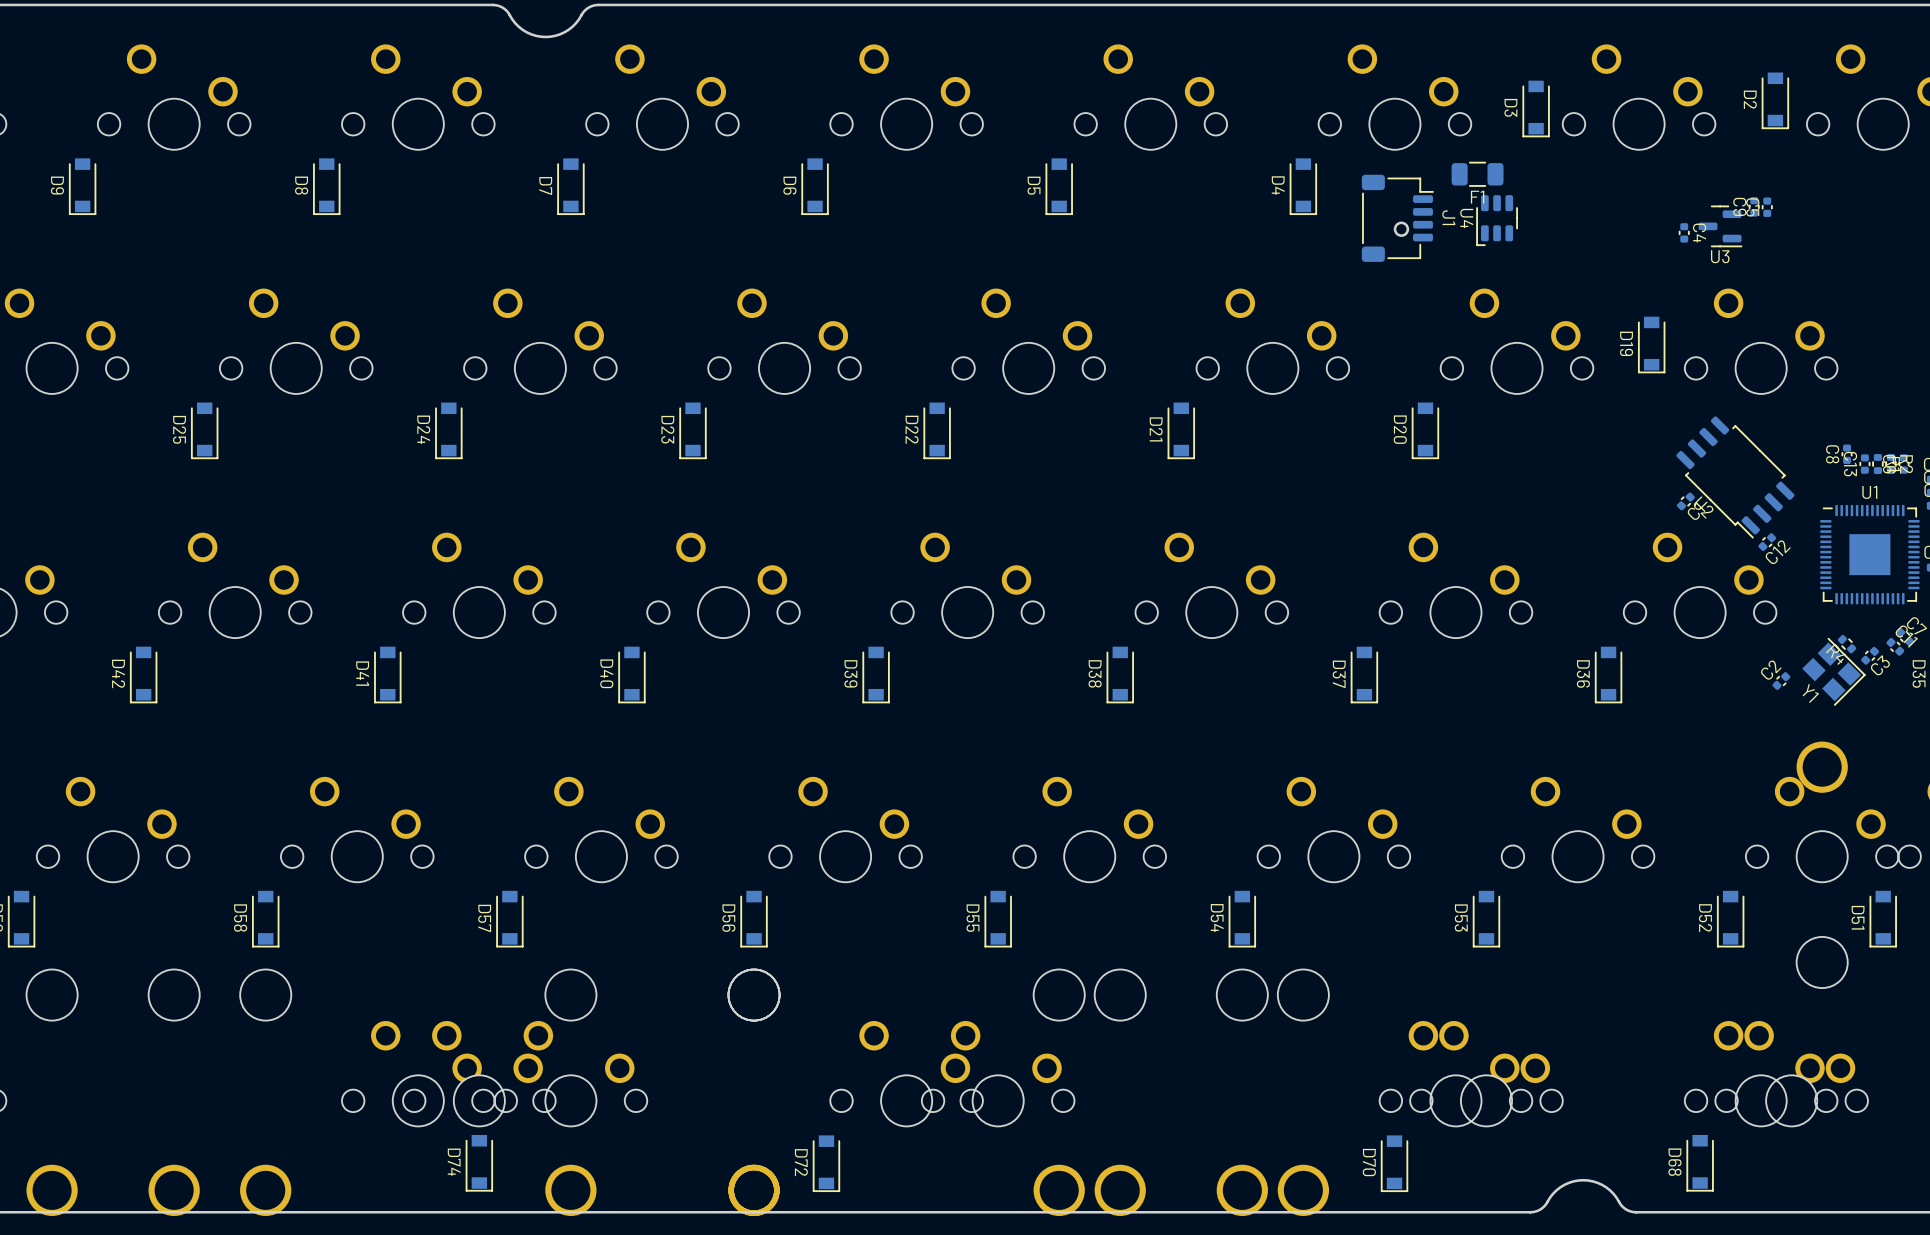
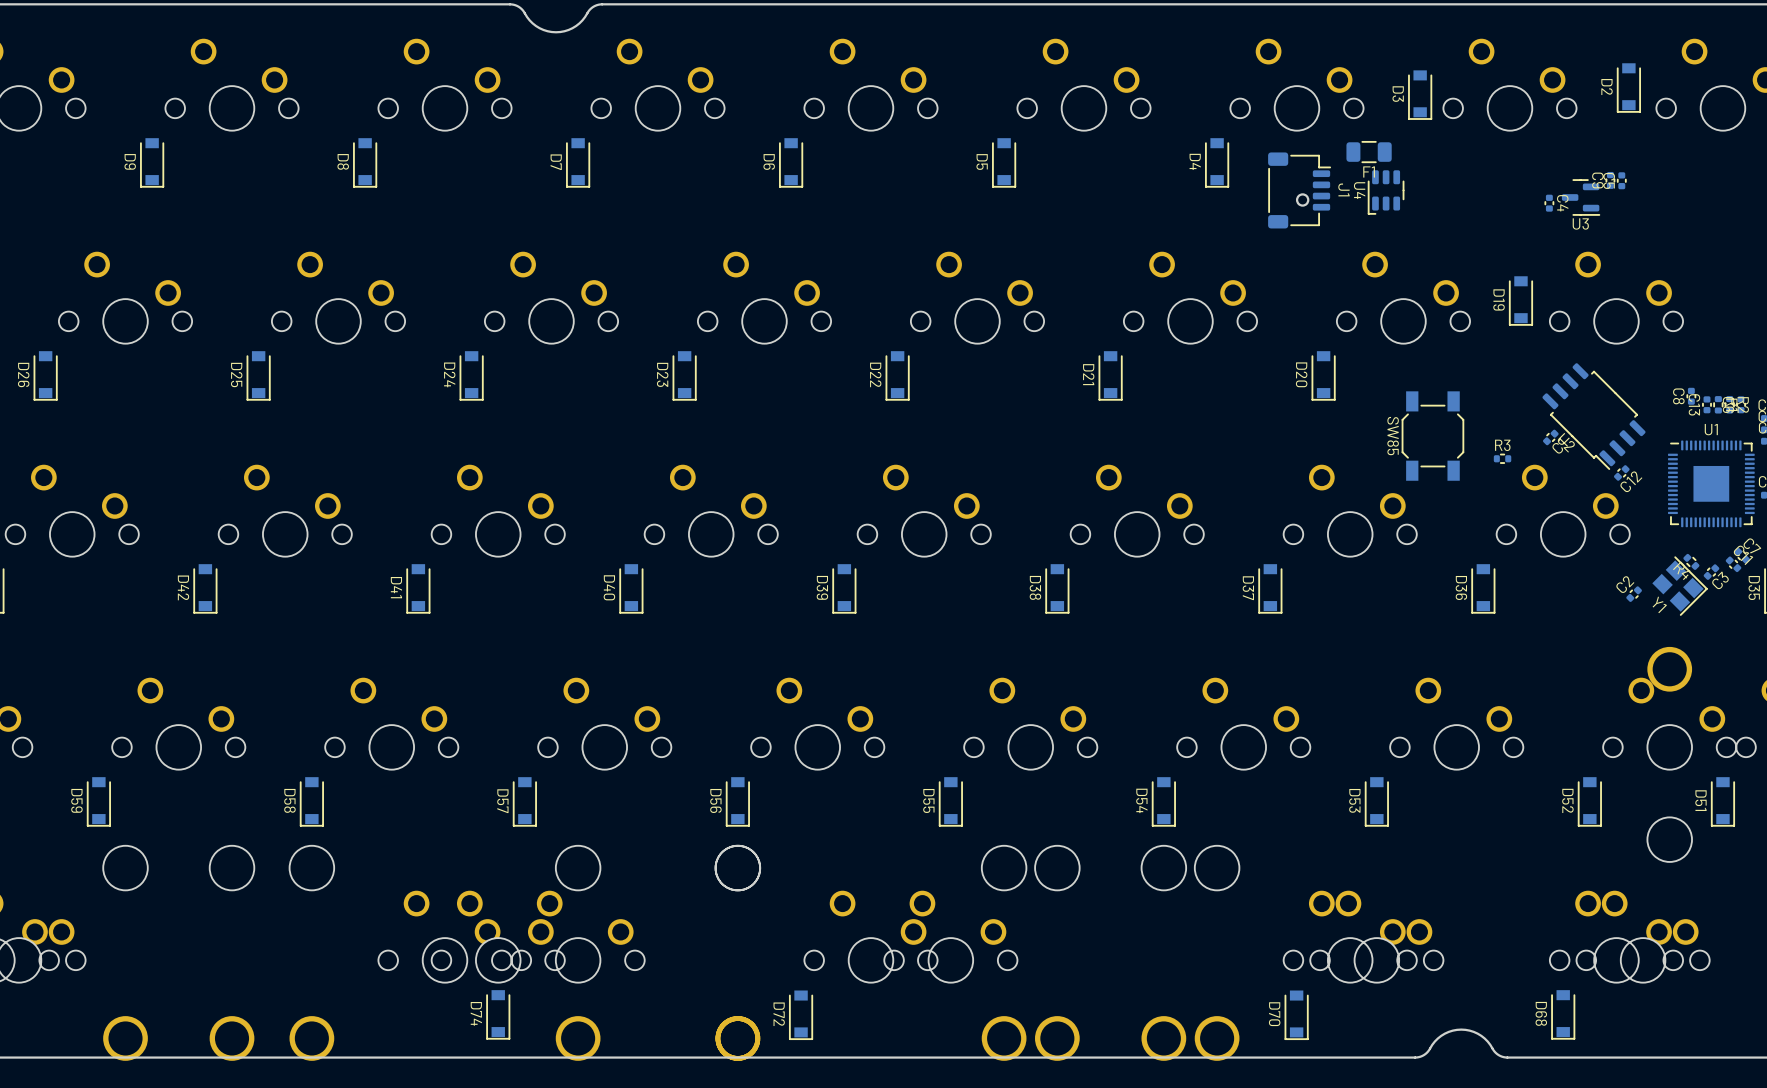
SW85: none -> (1432, 436)
R3: none -> (1502, 458)

